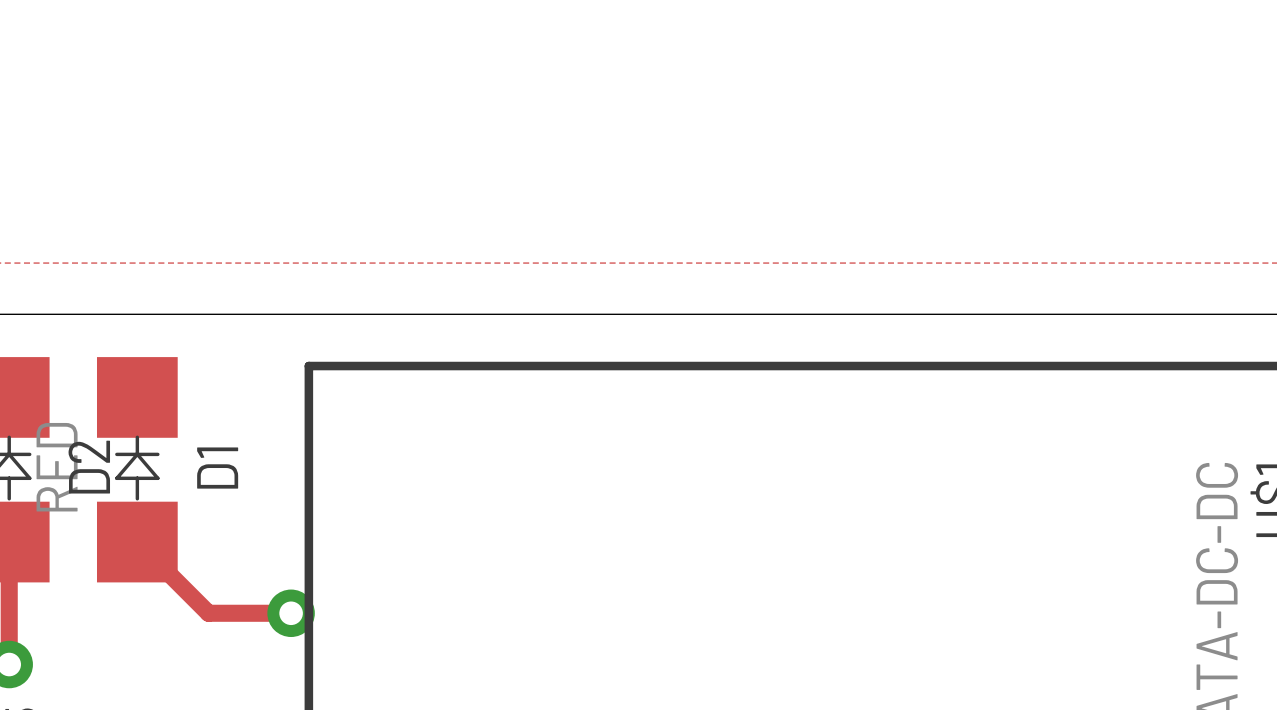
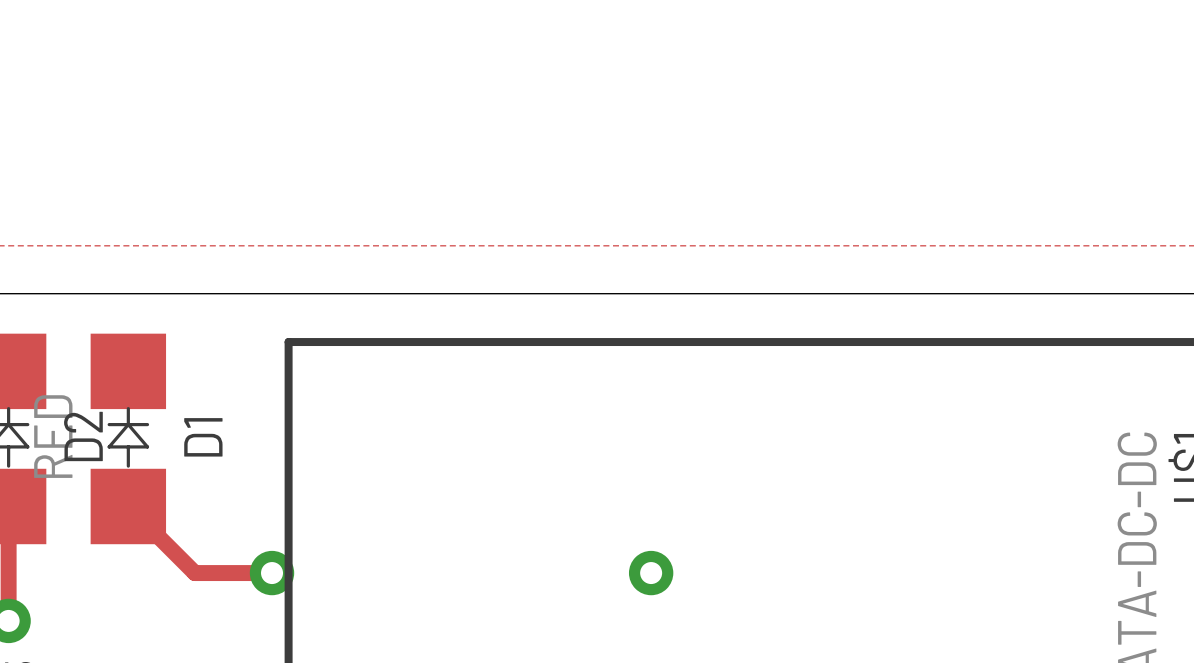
via: none -> (651, 573)

